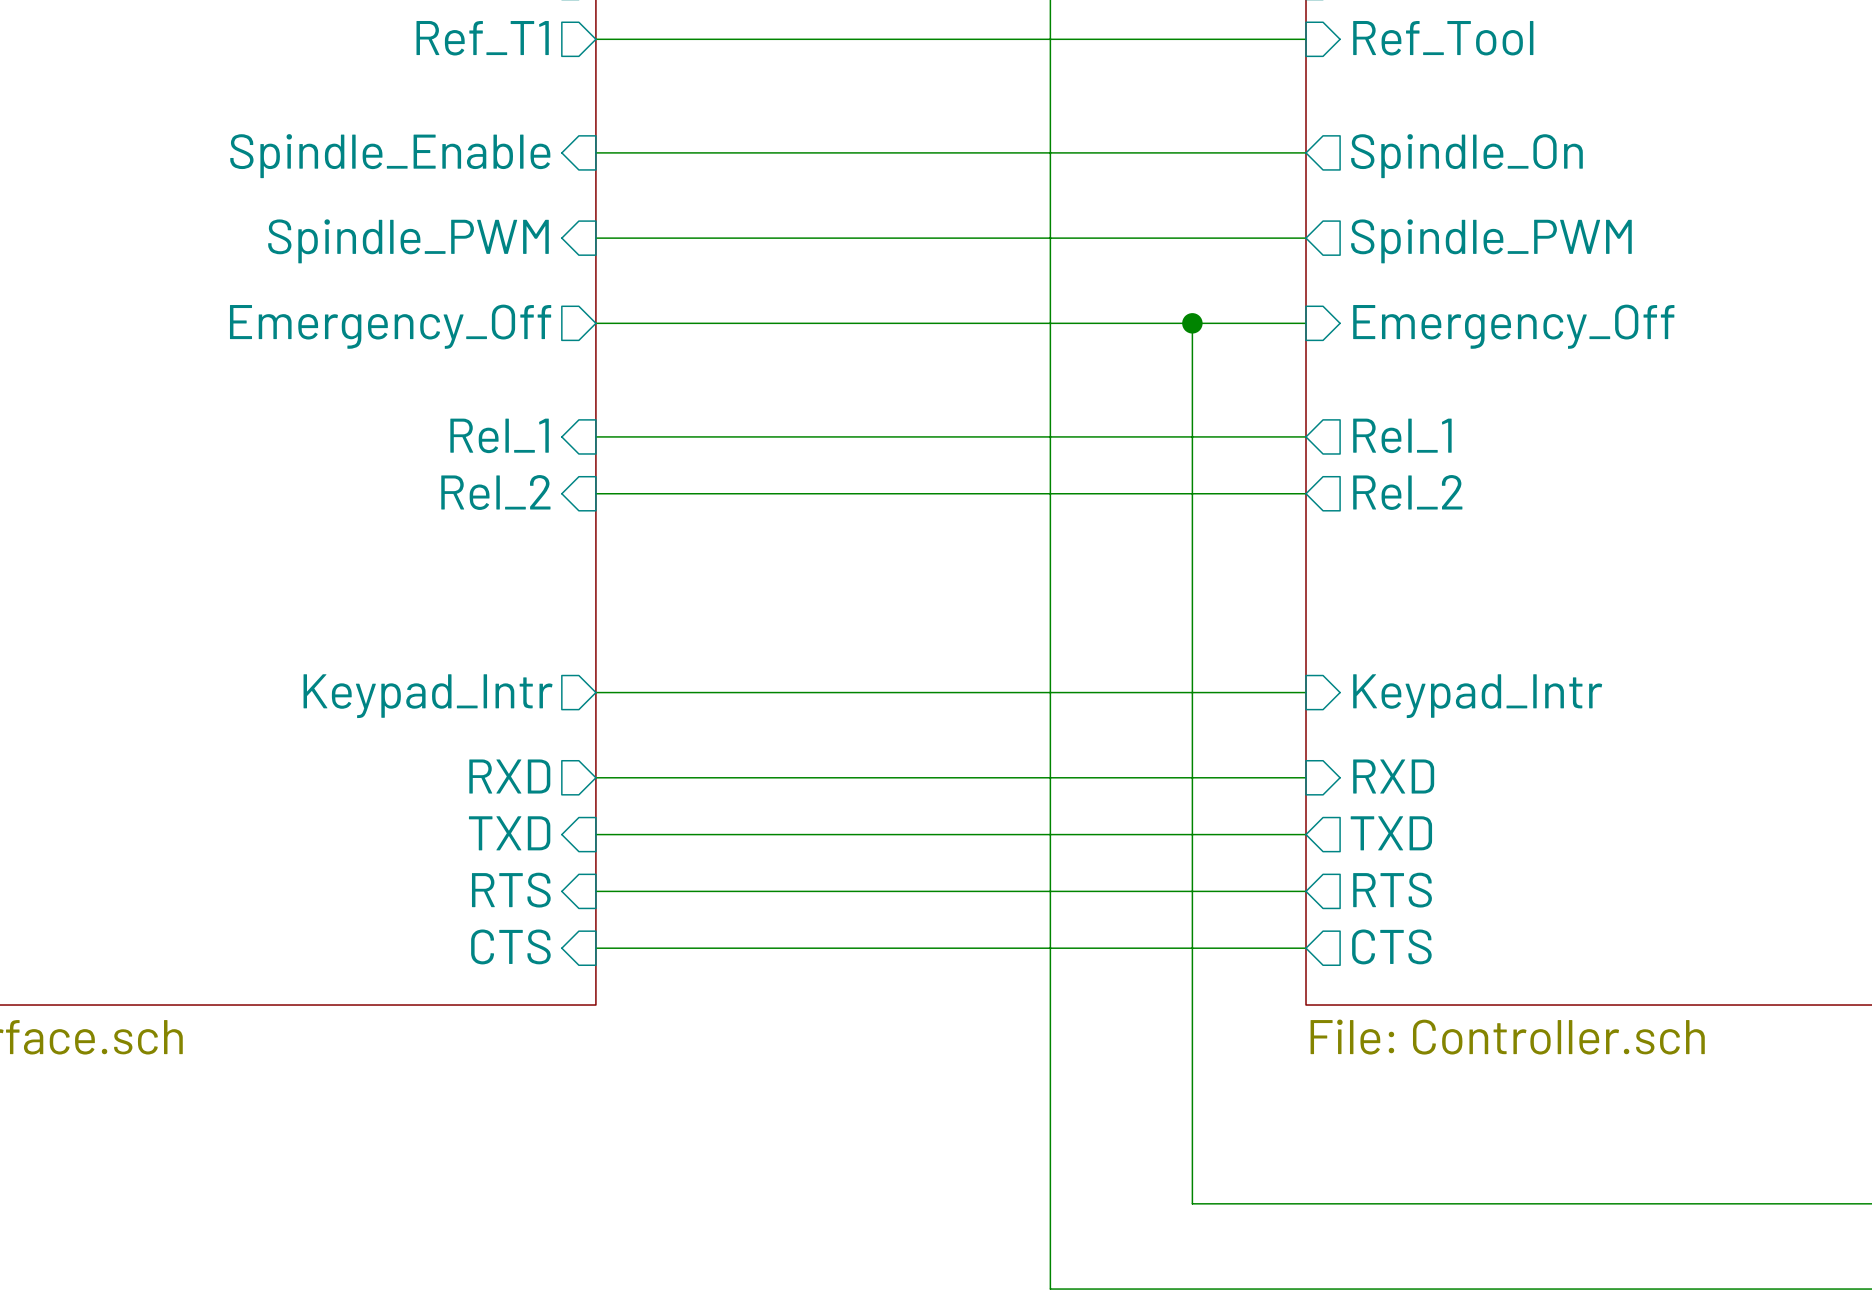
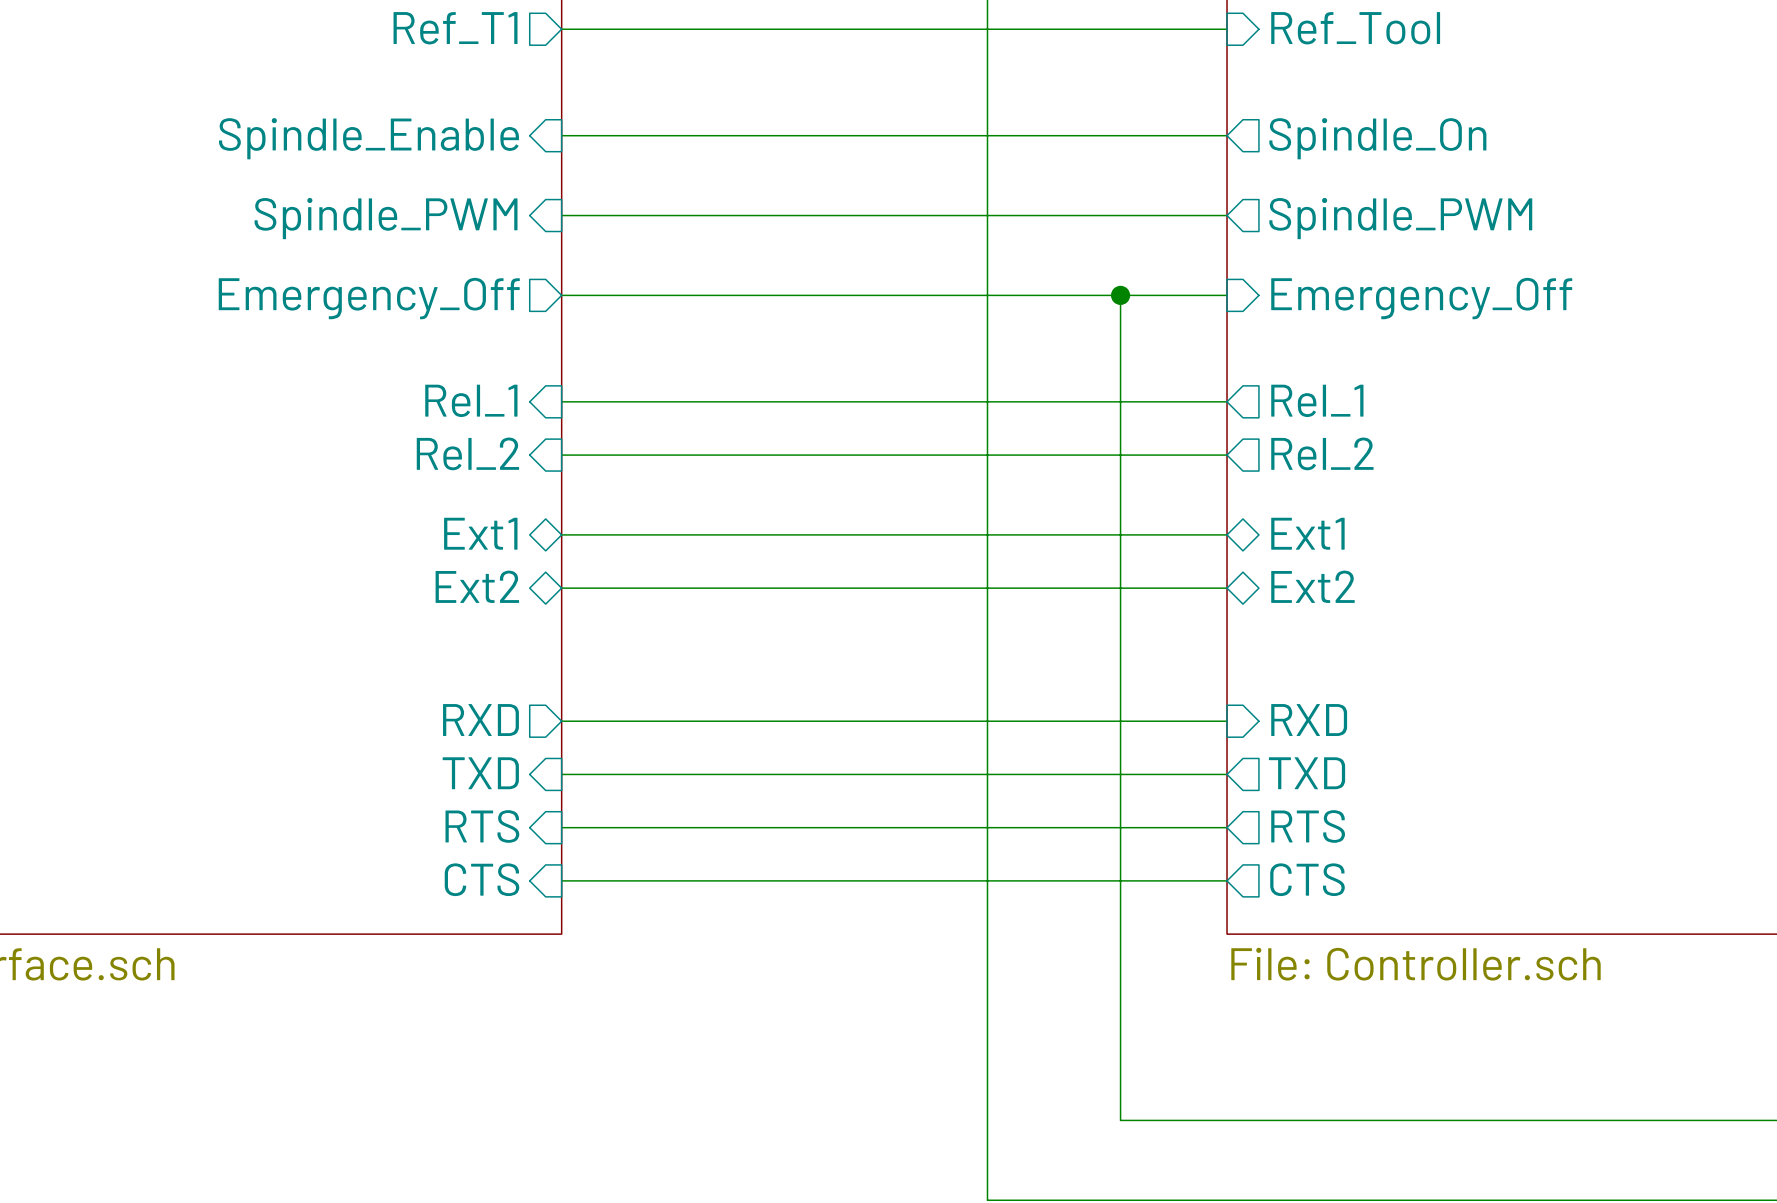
sheet pin: none -> Ext1 (480, 533)
sheet pin: none -> Ext1 (1307, 533)
wire: none -> (561, 534) (1227, 534)
sheet pin: none -> Ext2 (477, 586)
sheet pin: none -> Ext2 (1312, 586)
wire: (595, 692) (1306, 692) -> (561, 588) (1227, 588)
sheet pin: Keypad_Intr (428, 696) -> none
sheet pin: Keypad_Intr (1477, 696) -> none

